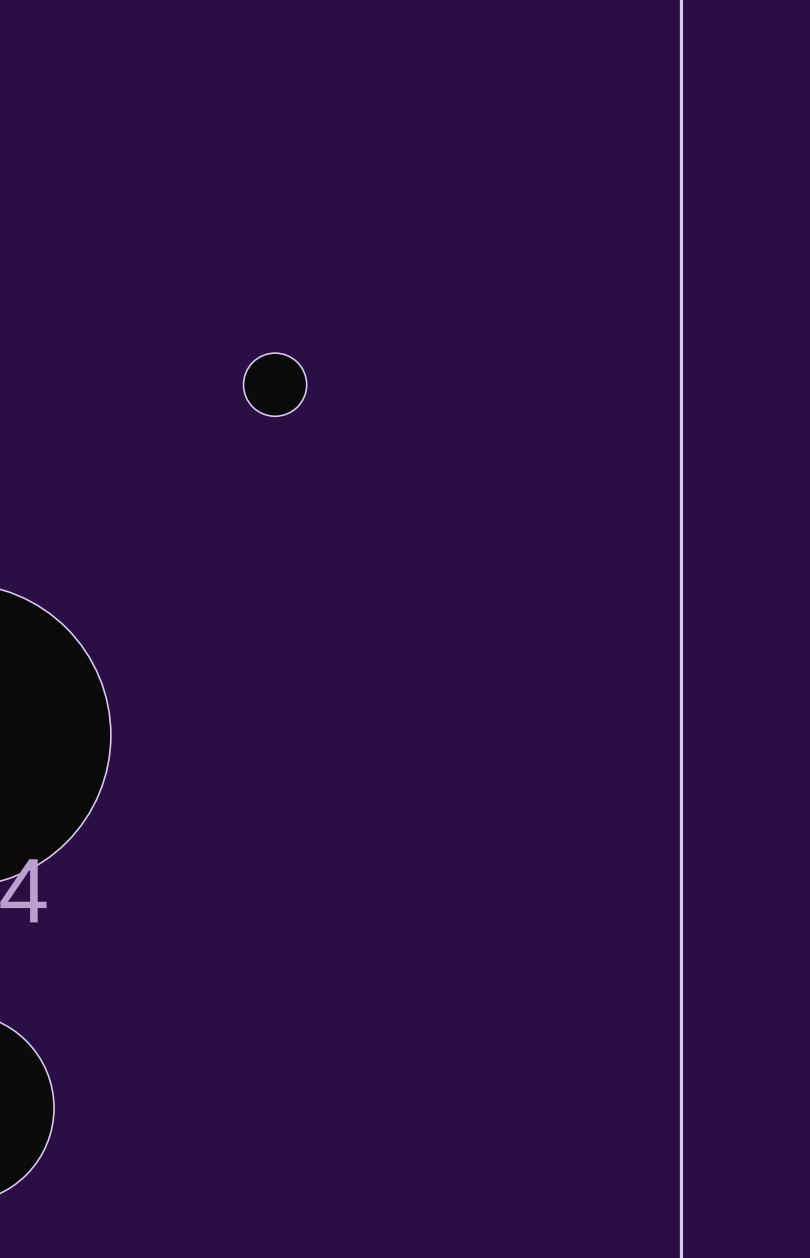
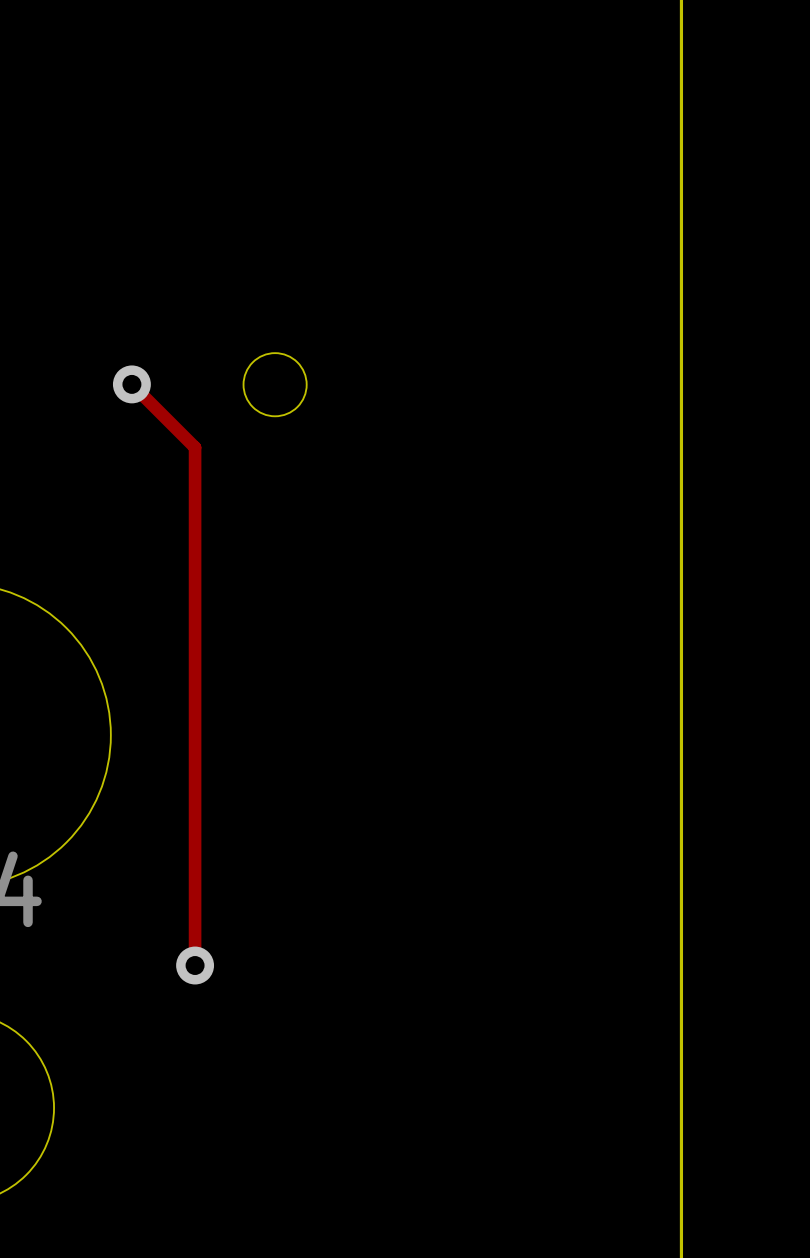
track: none -> (131, 384) (195, 447) (195, 965)
via: none -> (131, 384)
via: none -> (195, 965)

